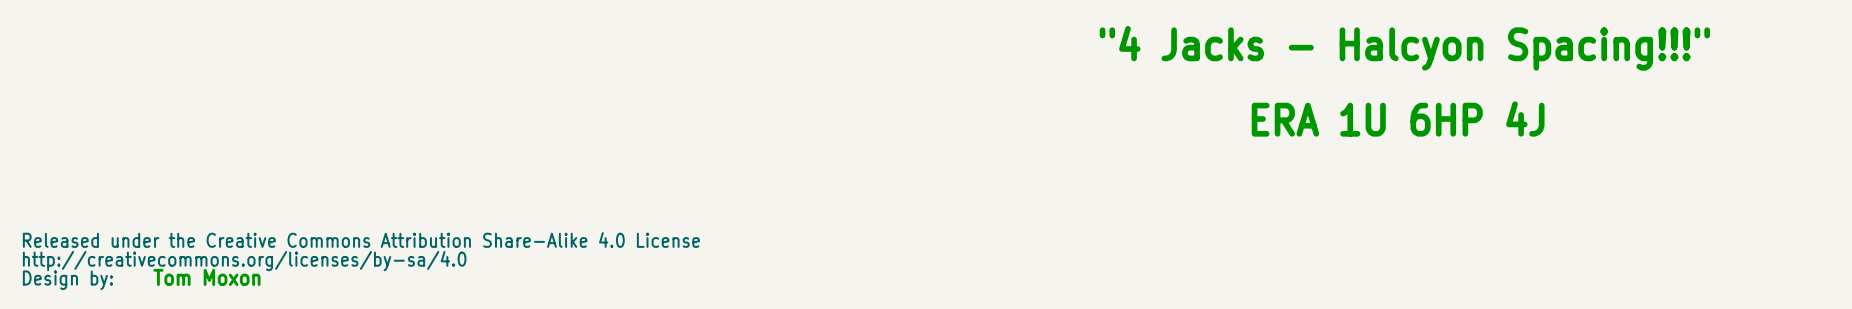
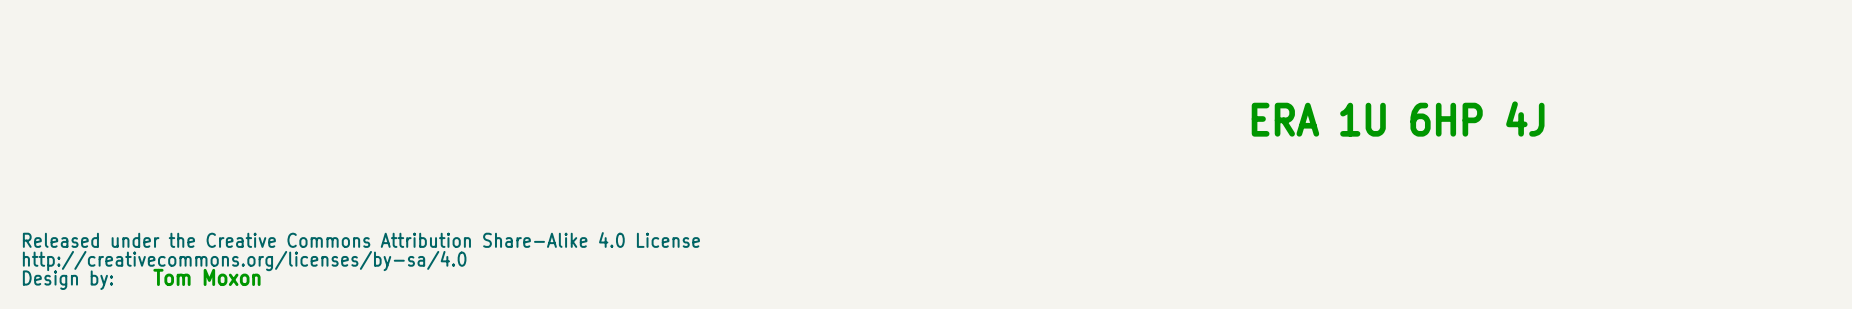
text: "4 Jacks - Halcyon Spacing!!!" (1404, 48) -> none

